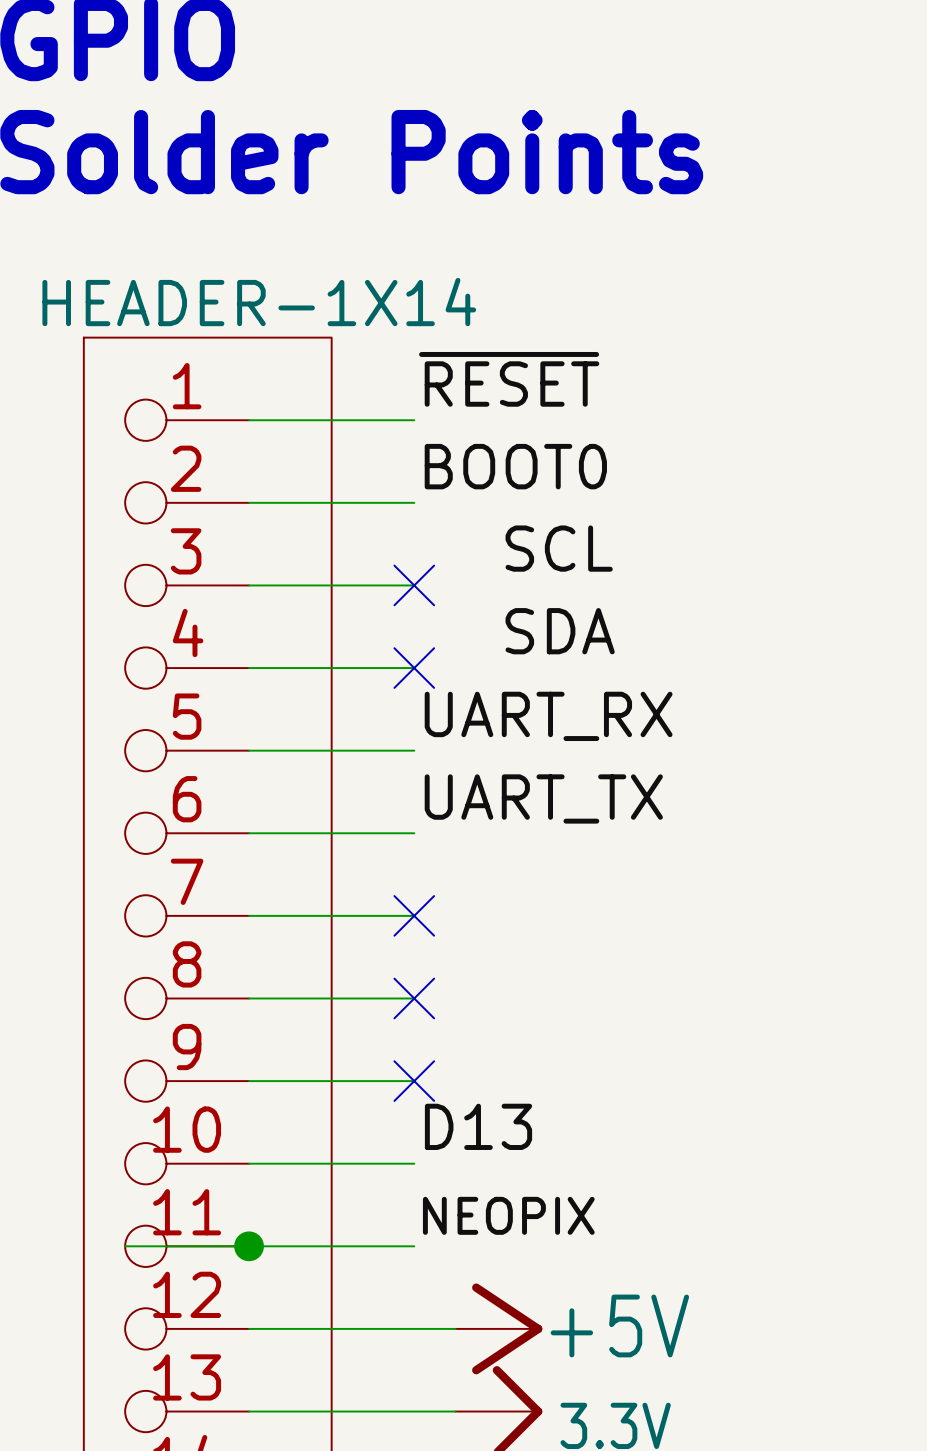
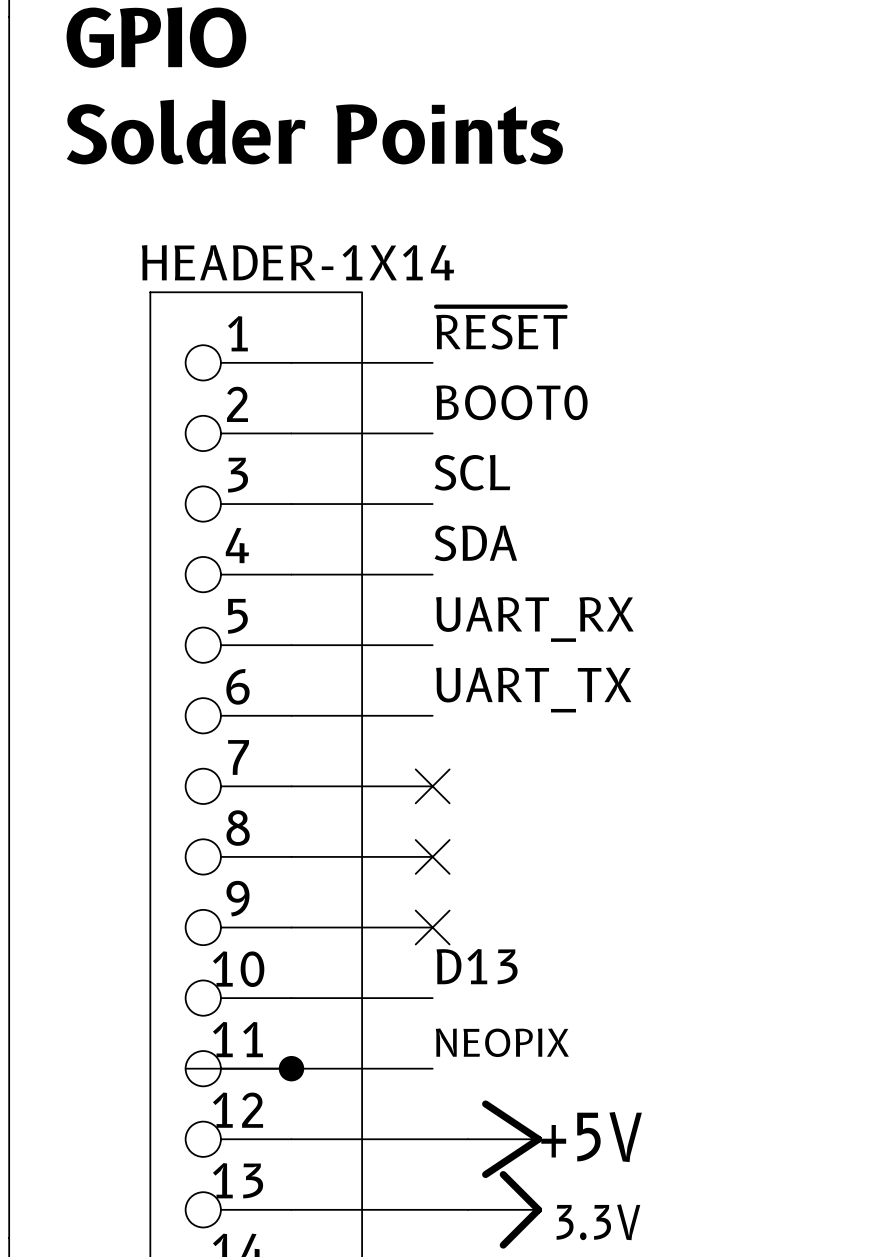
label position: SCL (559, 548) -> SCL (472, 472)
no-connect mark: (414, 585) -> none
label position: SDA (560, 631) -> SDA (475, 543)
no-connect mark: (414, 668) -> none

